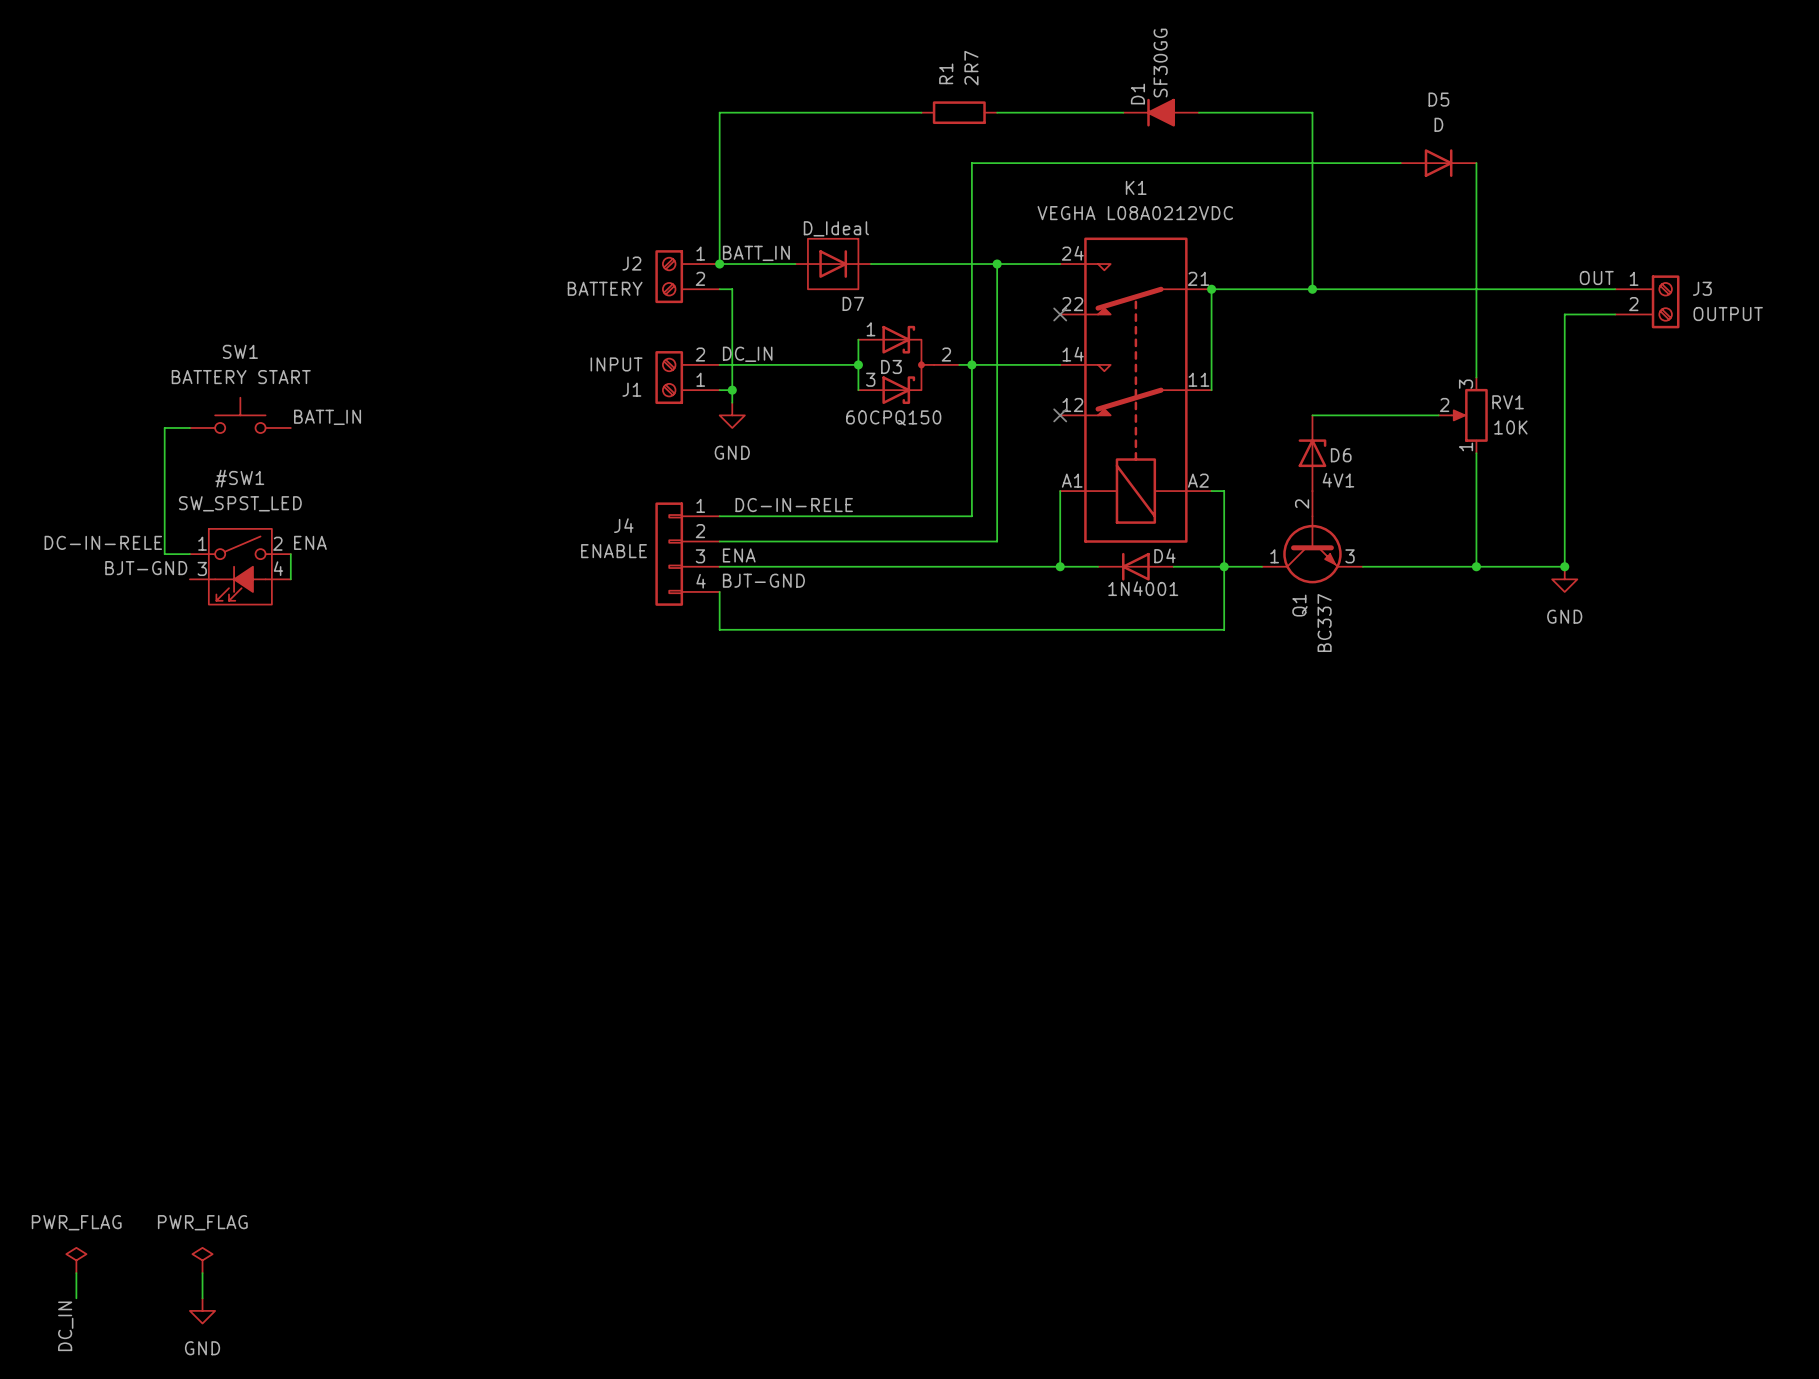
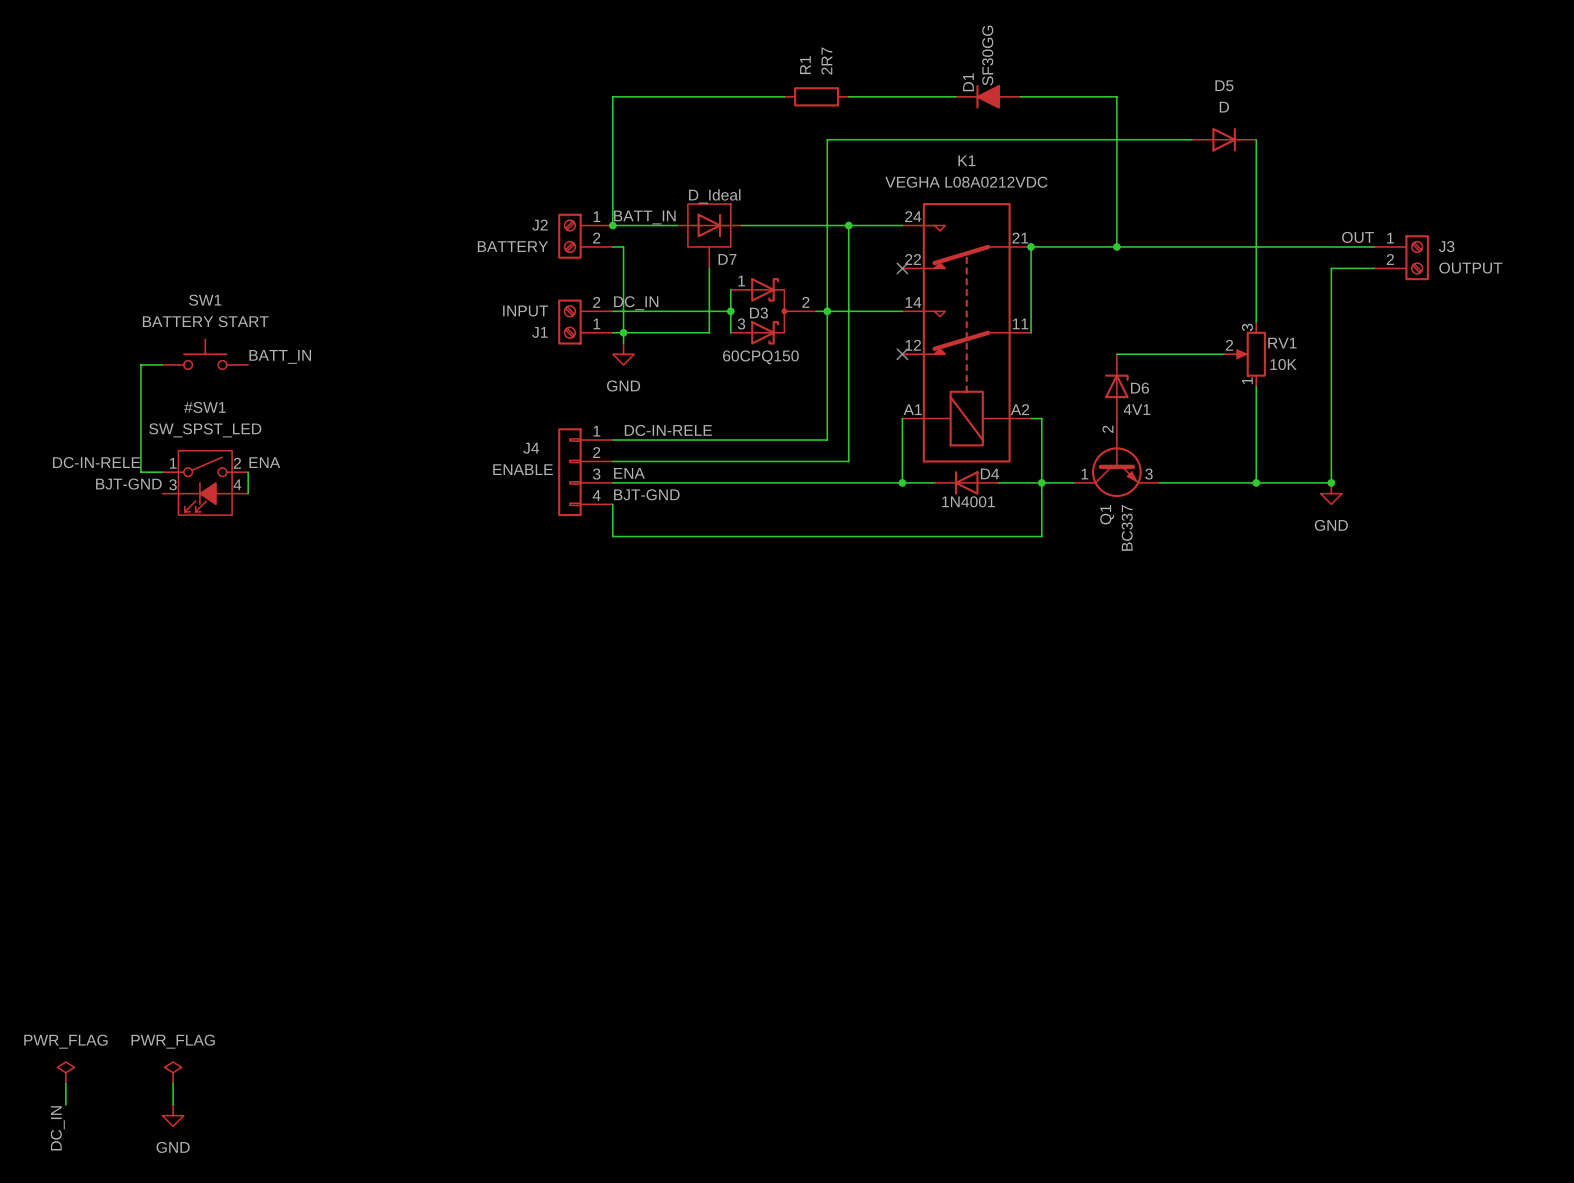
D7 symbol: [795, 238, 872, 290] -> [677, 204, 742, 269]
wire: none -> (709, 268) (709, 332) (623, 332)

